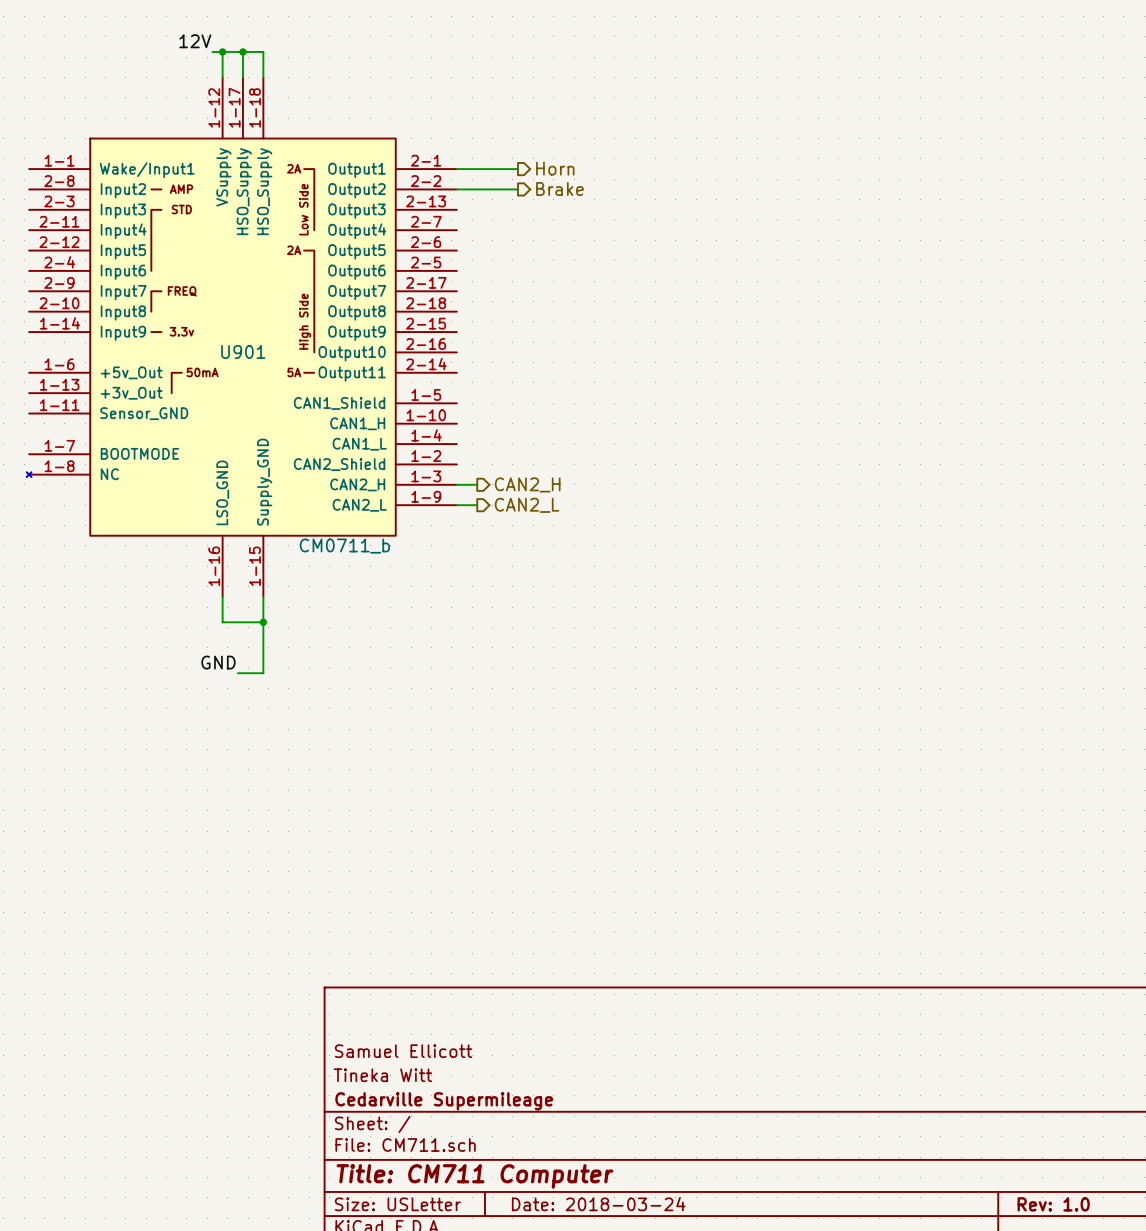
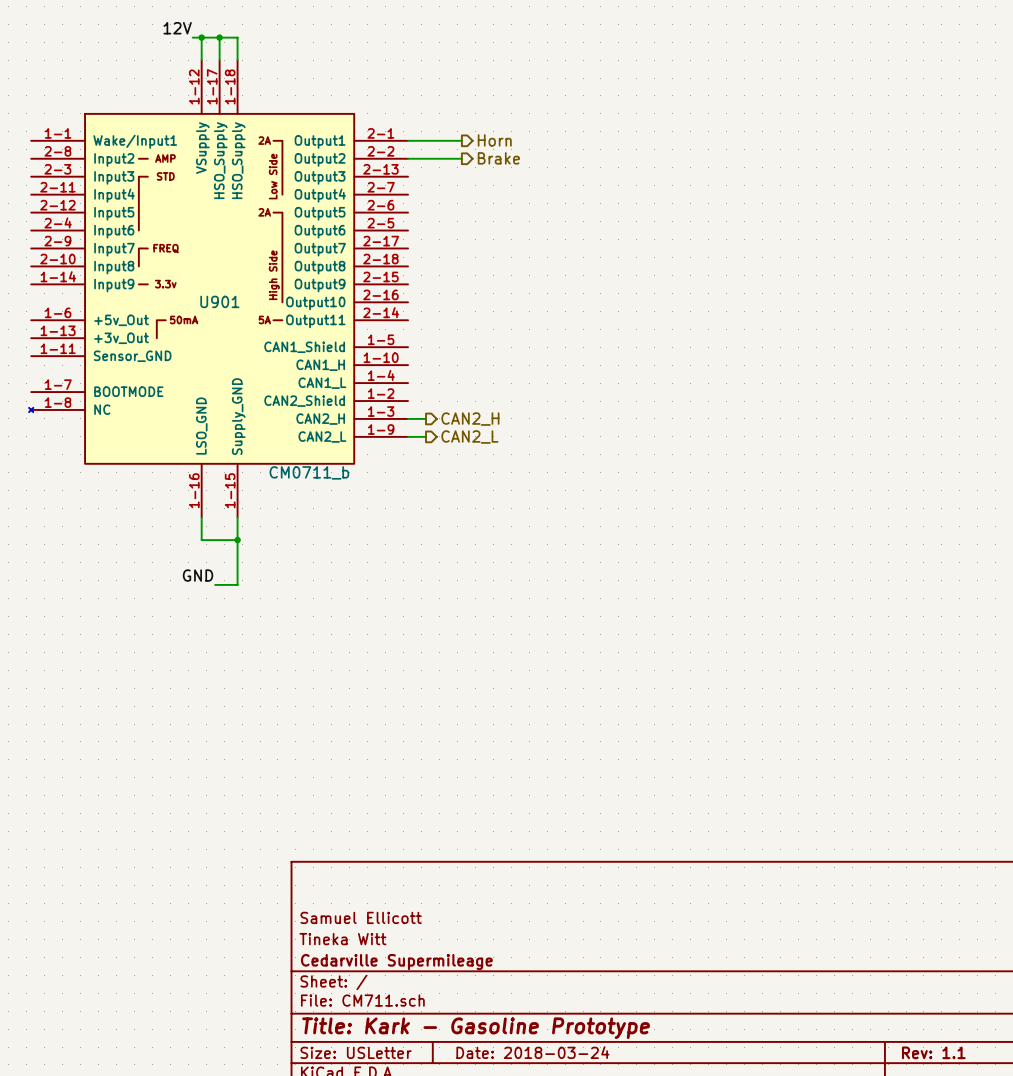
title block: Title: CM711 Computer (475, 1176) -> Title: Kark - Gasoline Prototype (476, 1028)
title block: Rev: 1.0 (1053, 1204) -> Rev: 1.1 (933, 1052)

